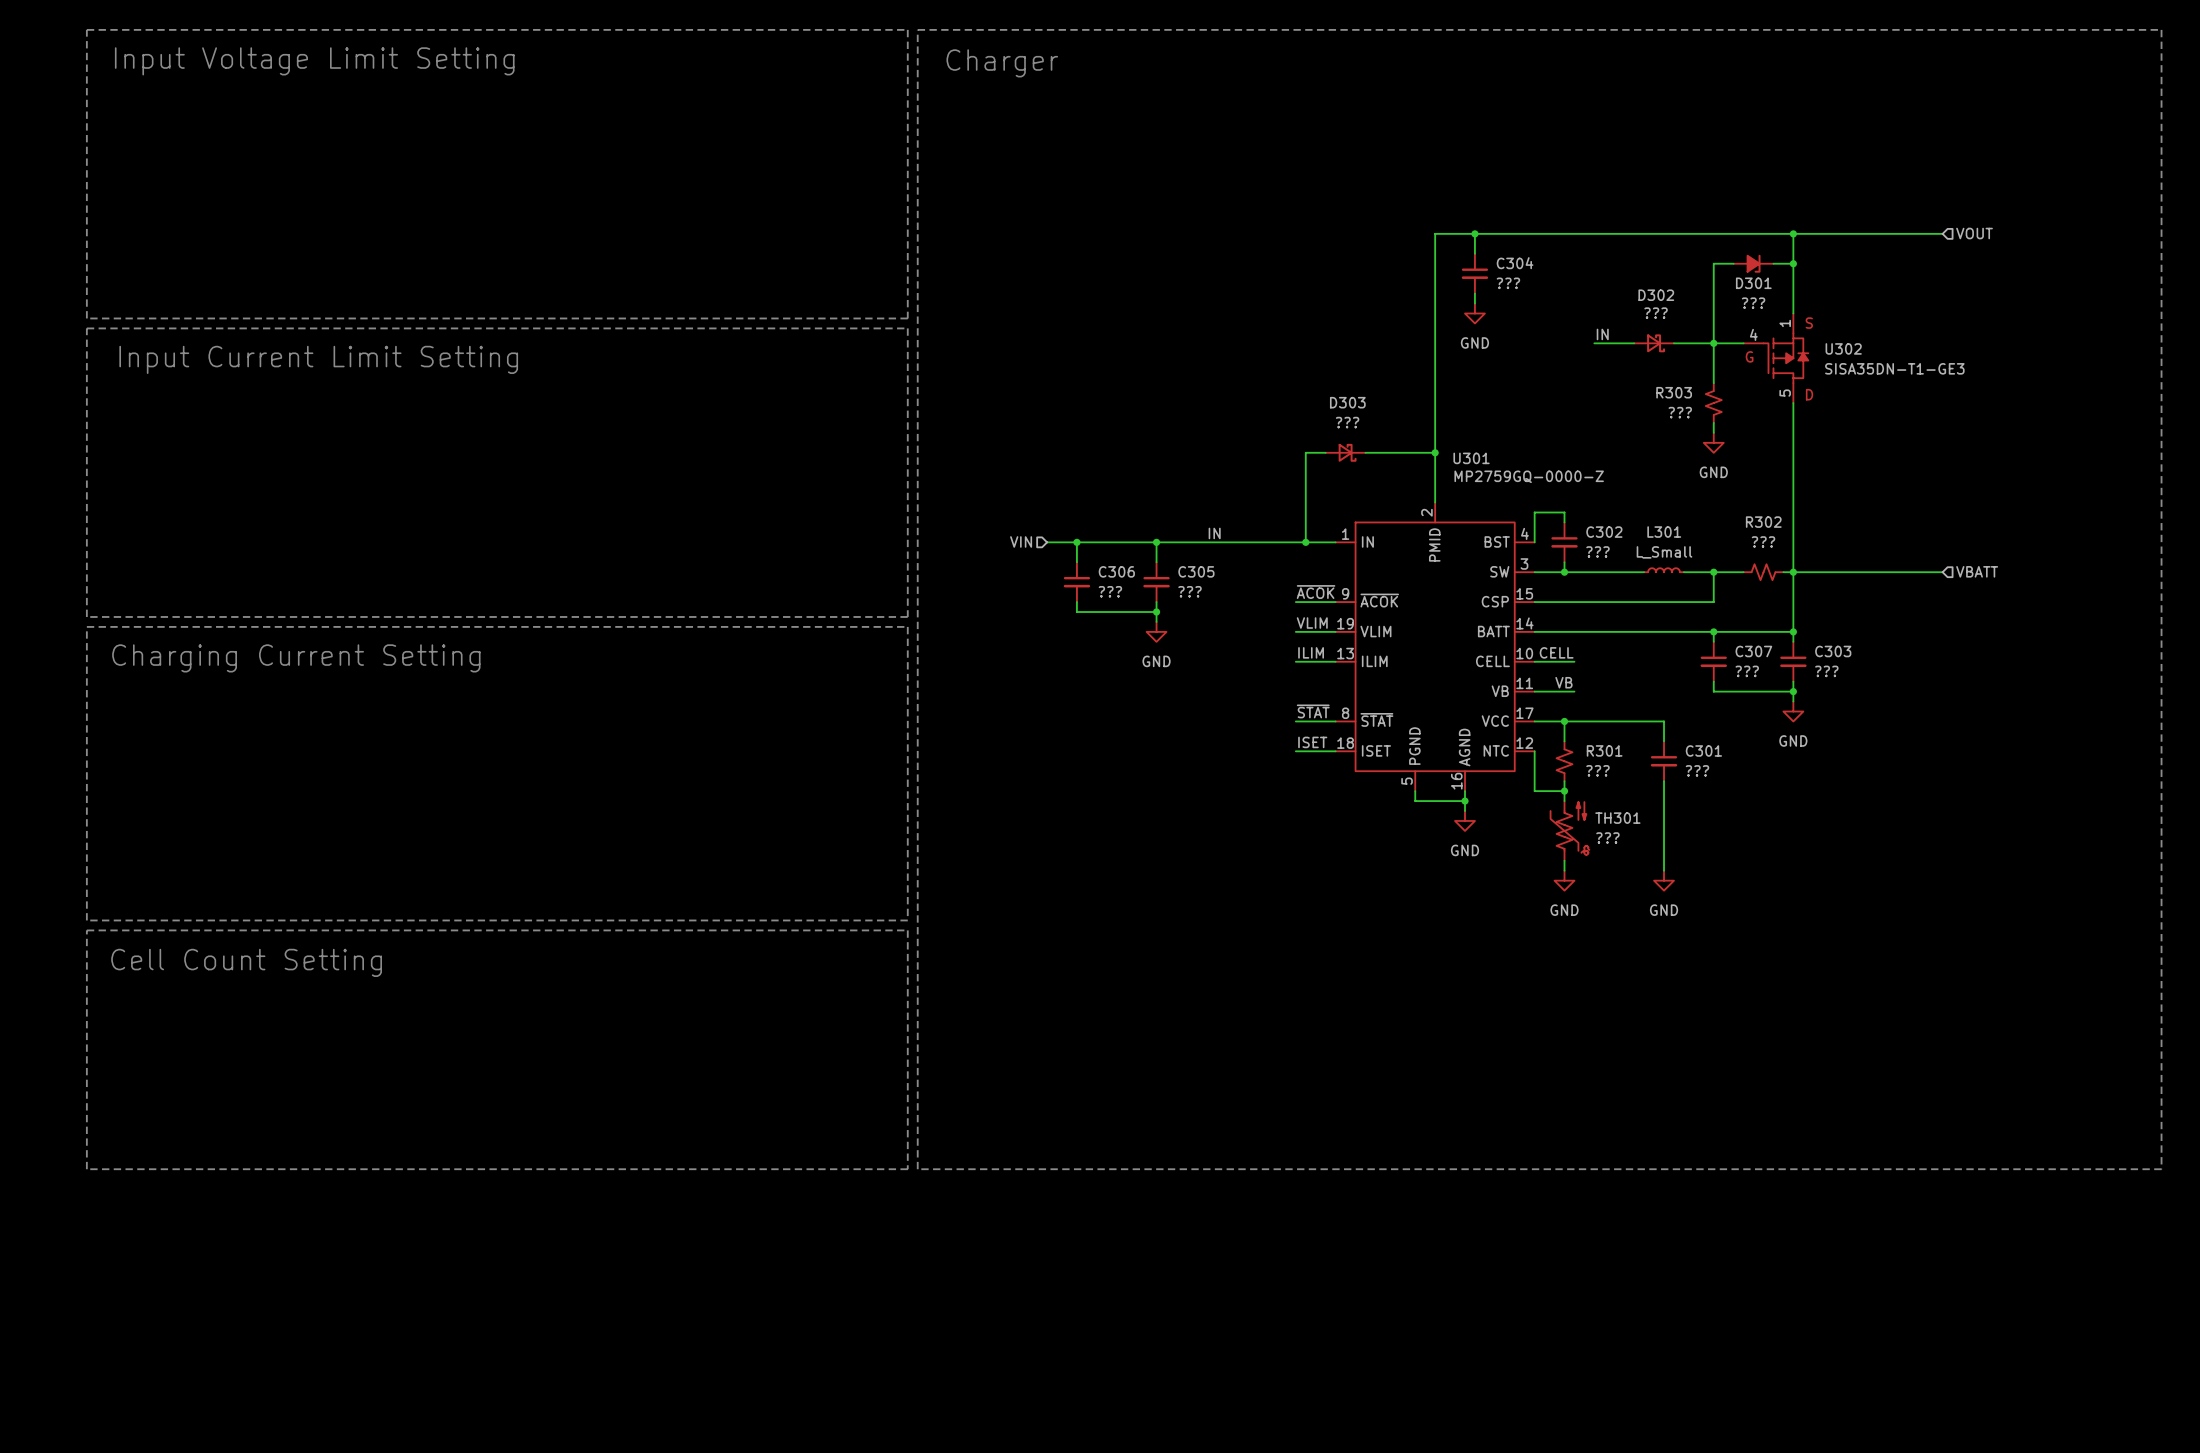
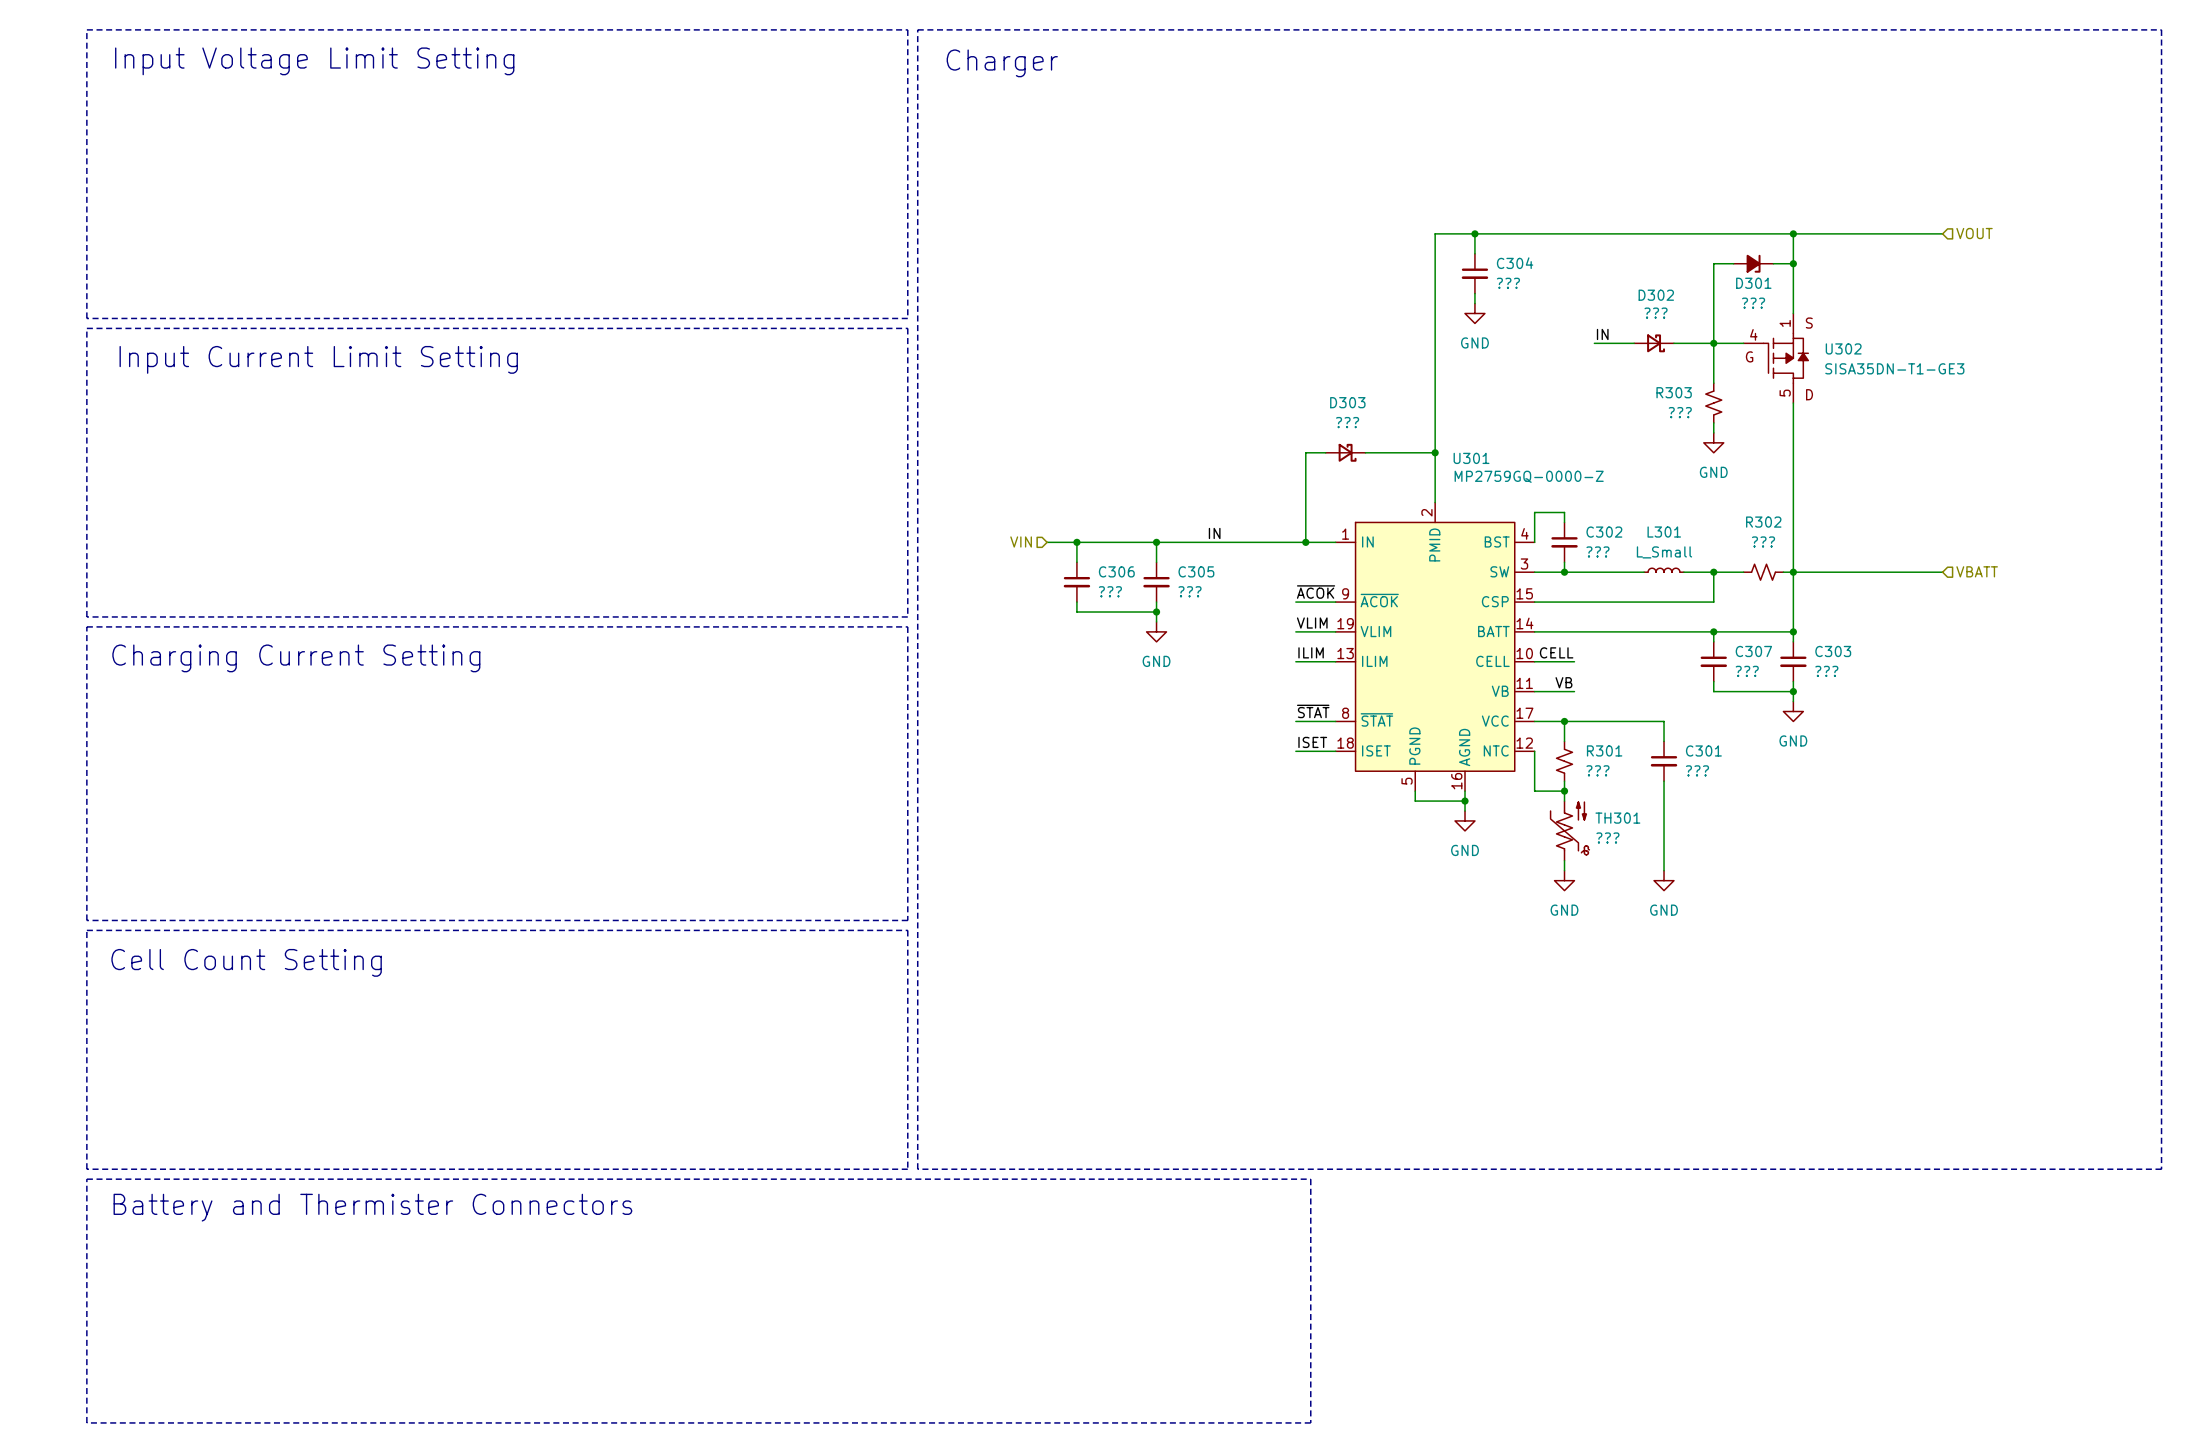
line: none -> (86, 1179) (1310, 1179) (1310, 1422) (86, 1422) (86, 1179)
text: none -> Battery and Thermister Connectors (372, 1207)

